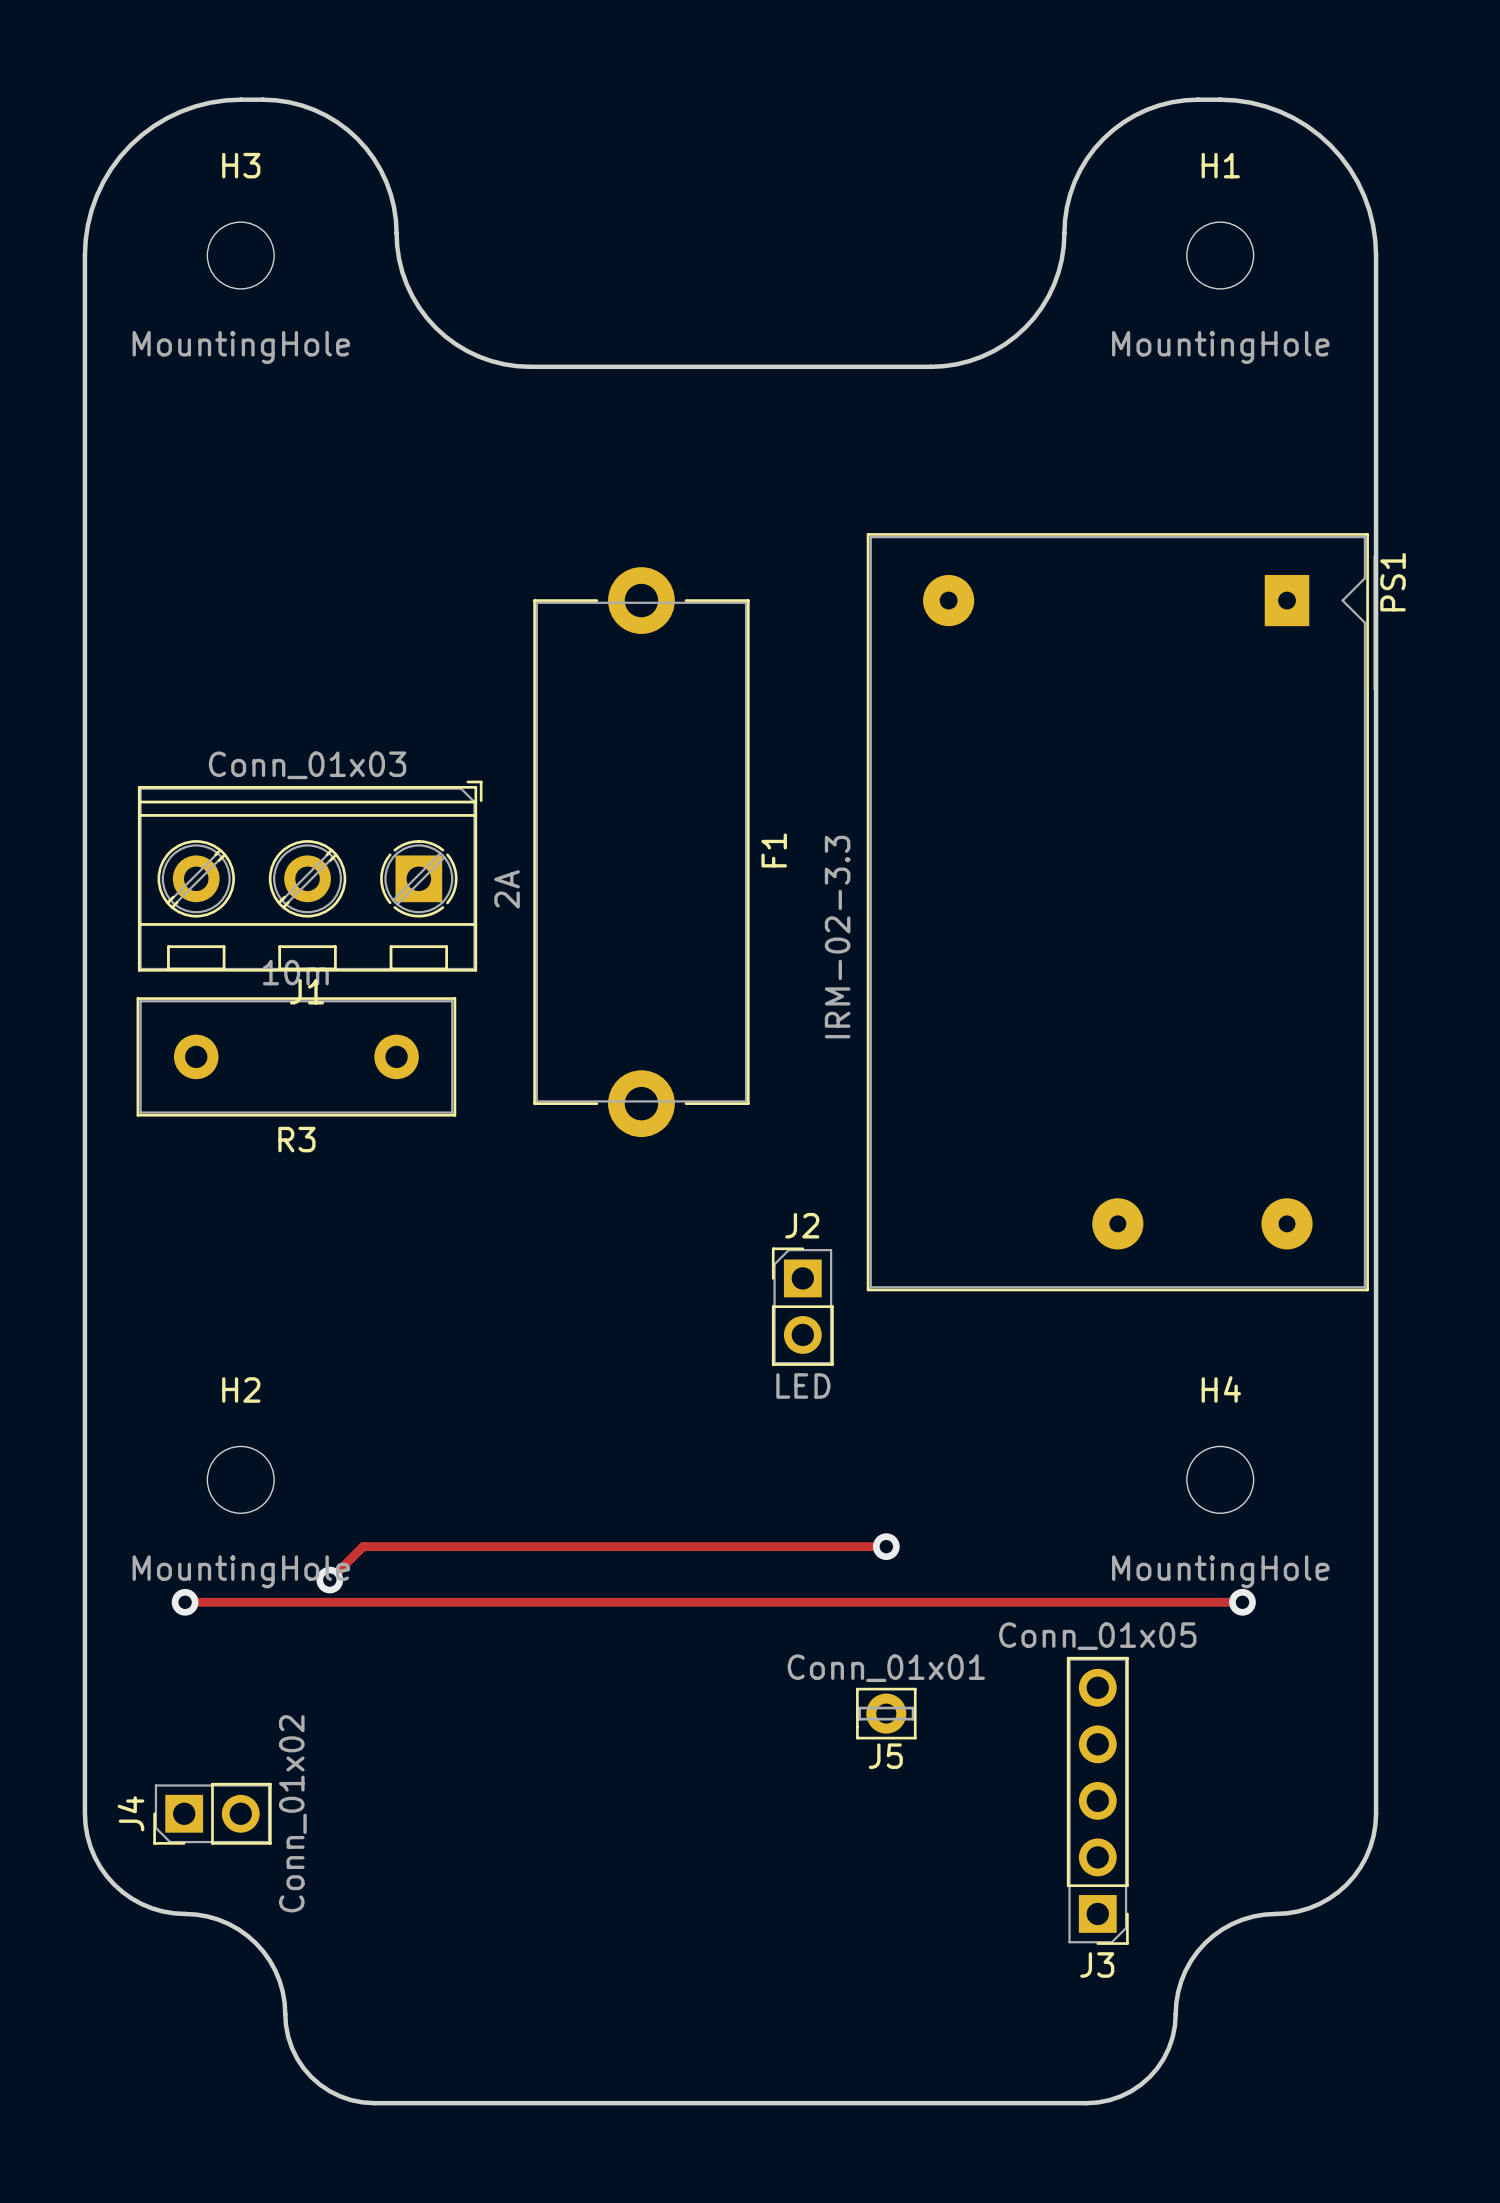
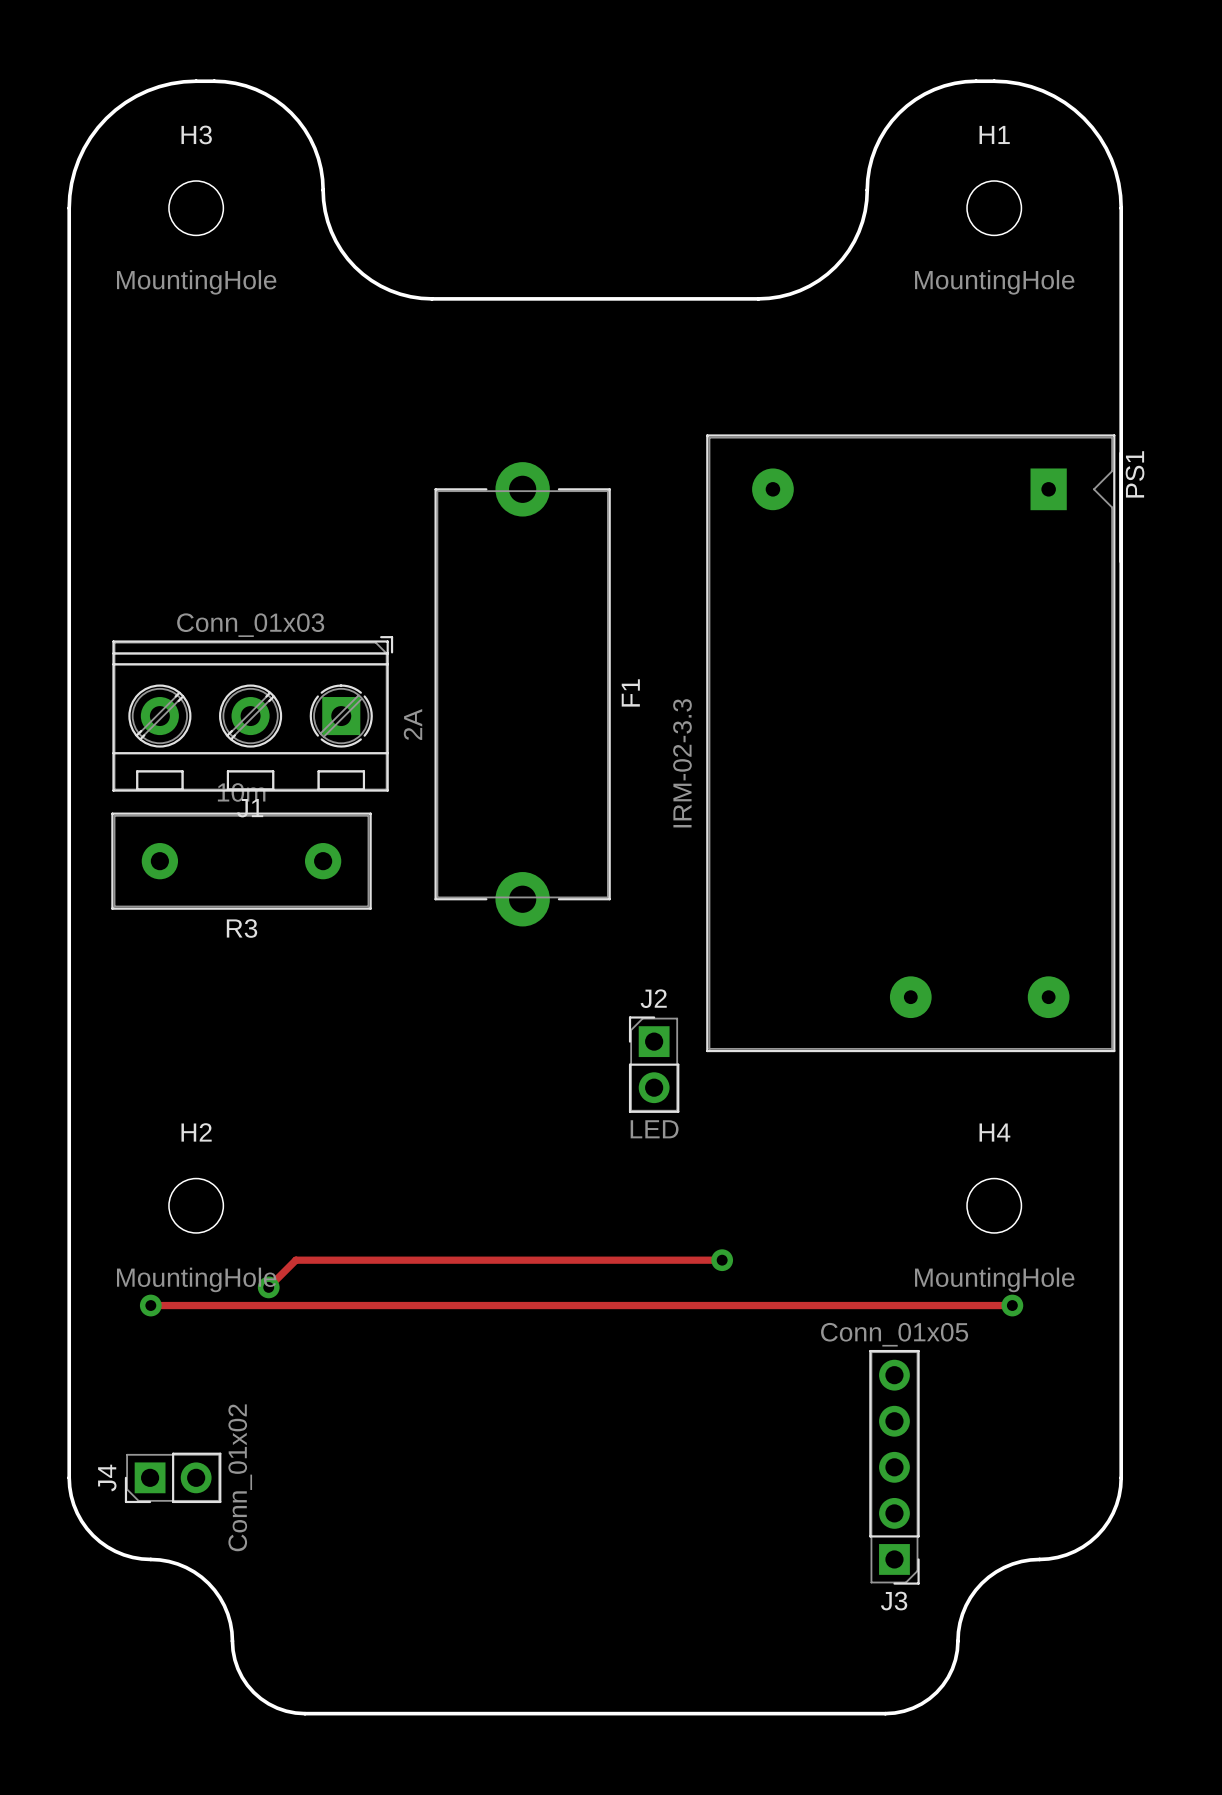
J5: Conn_01x01 (886, 1713) -> none

